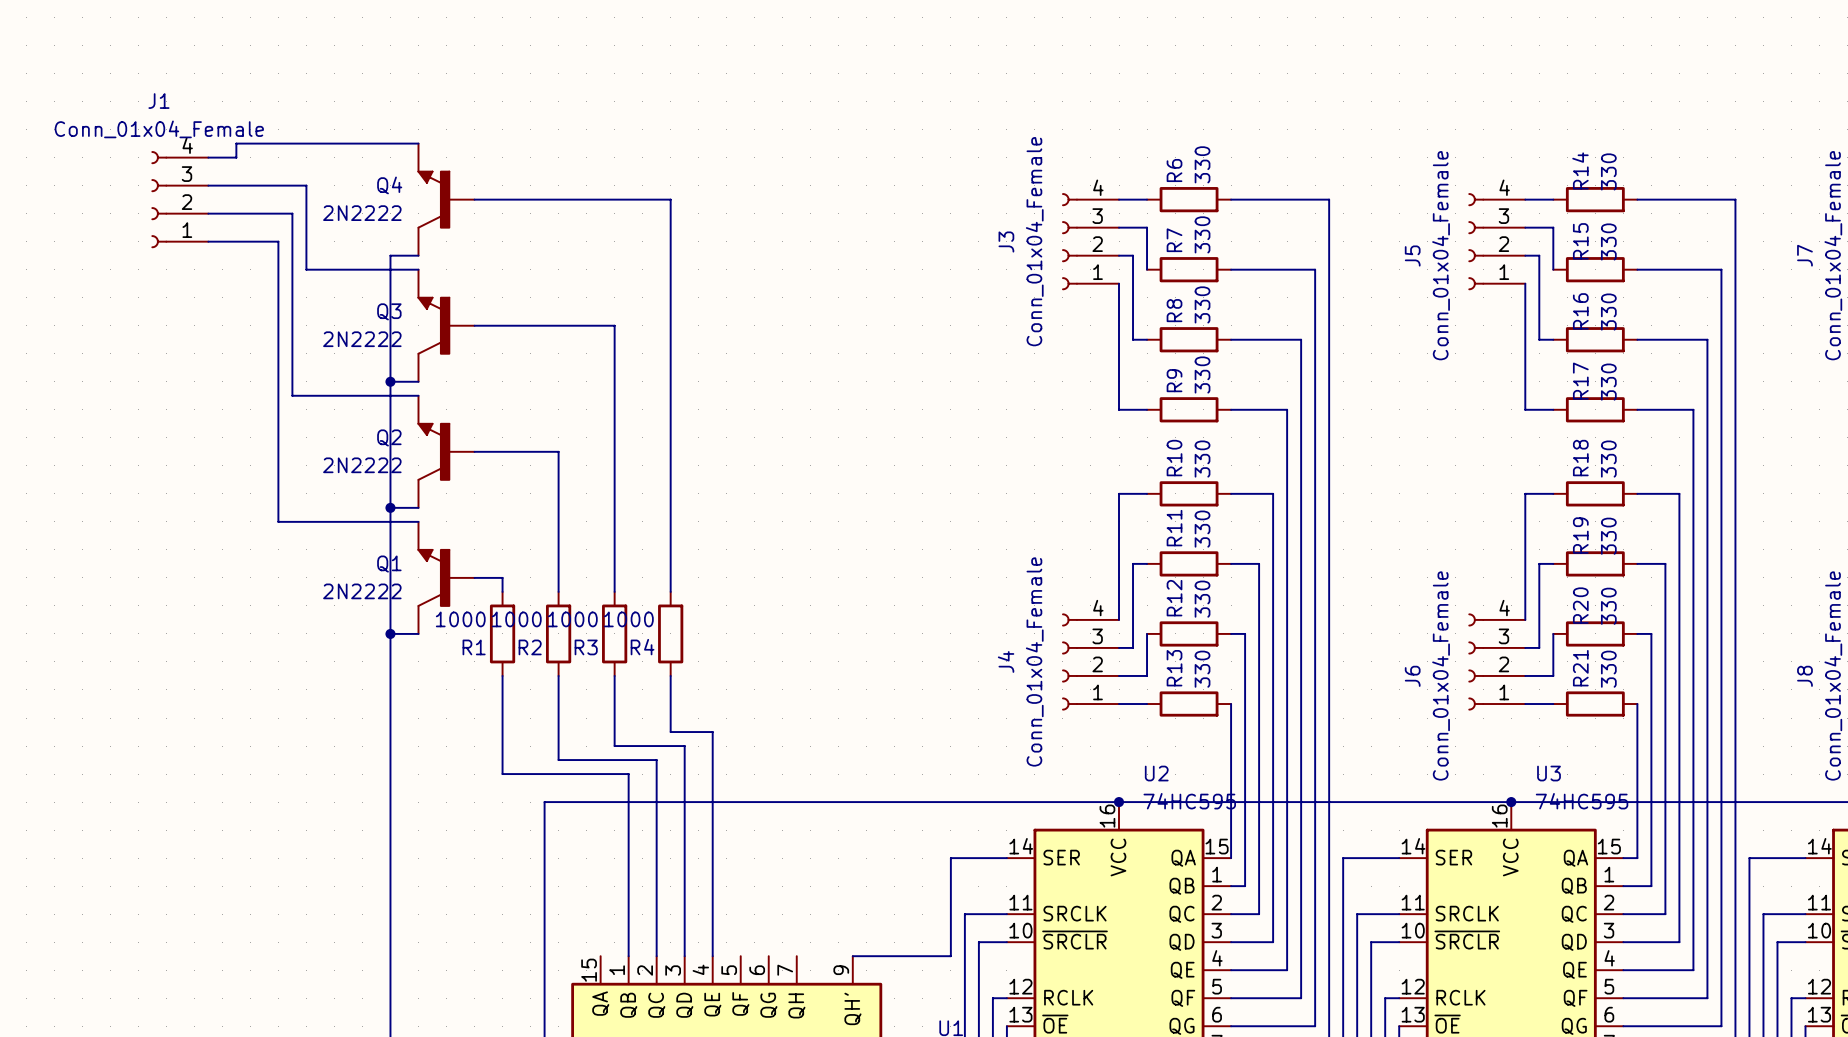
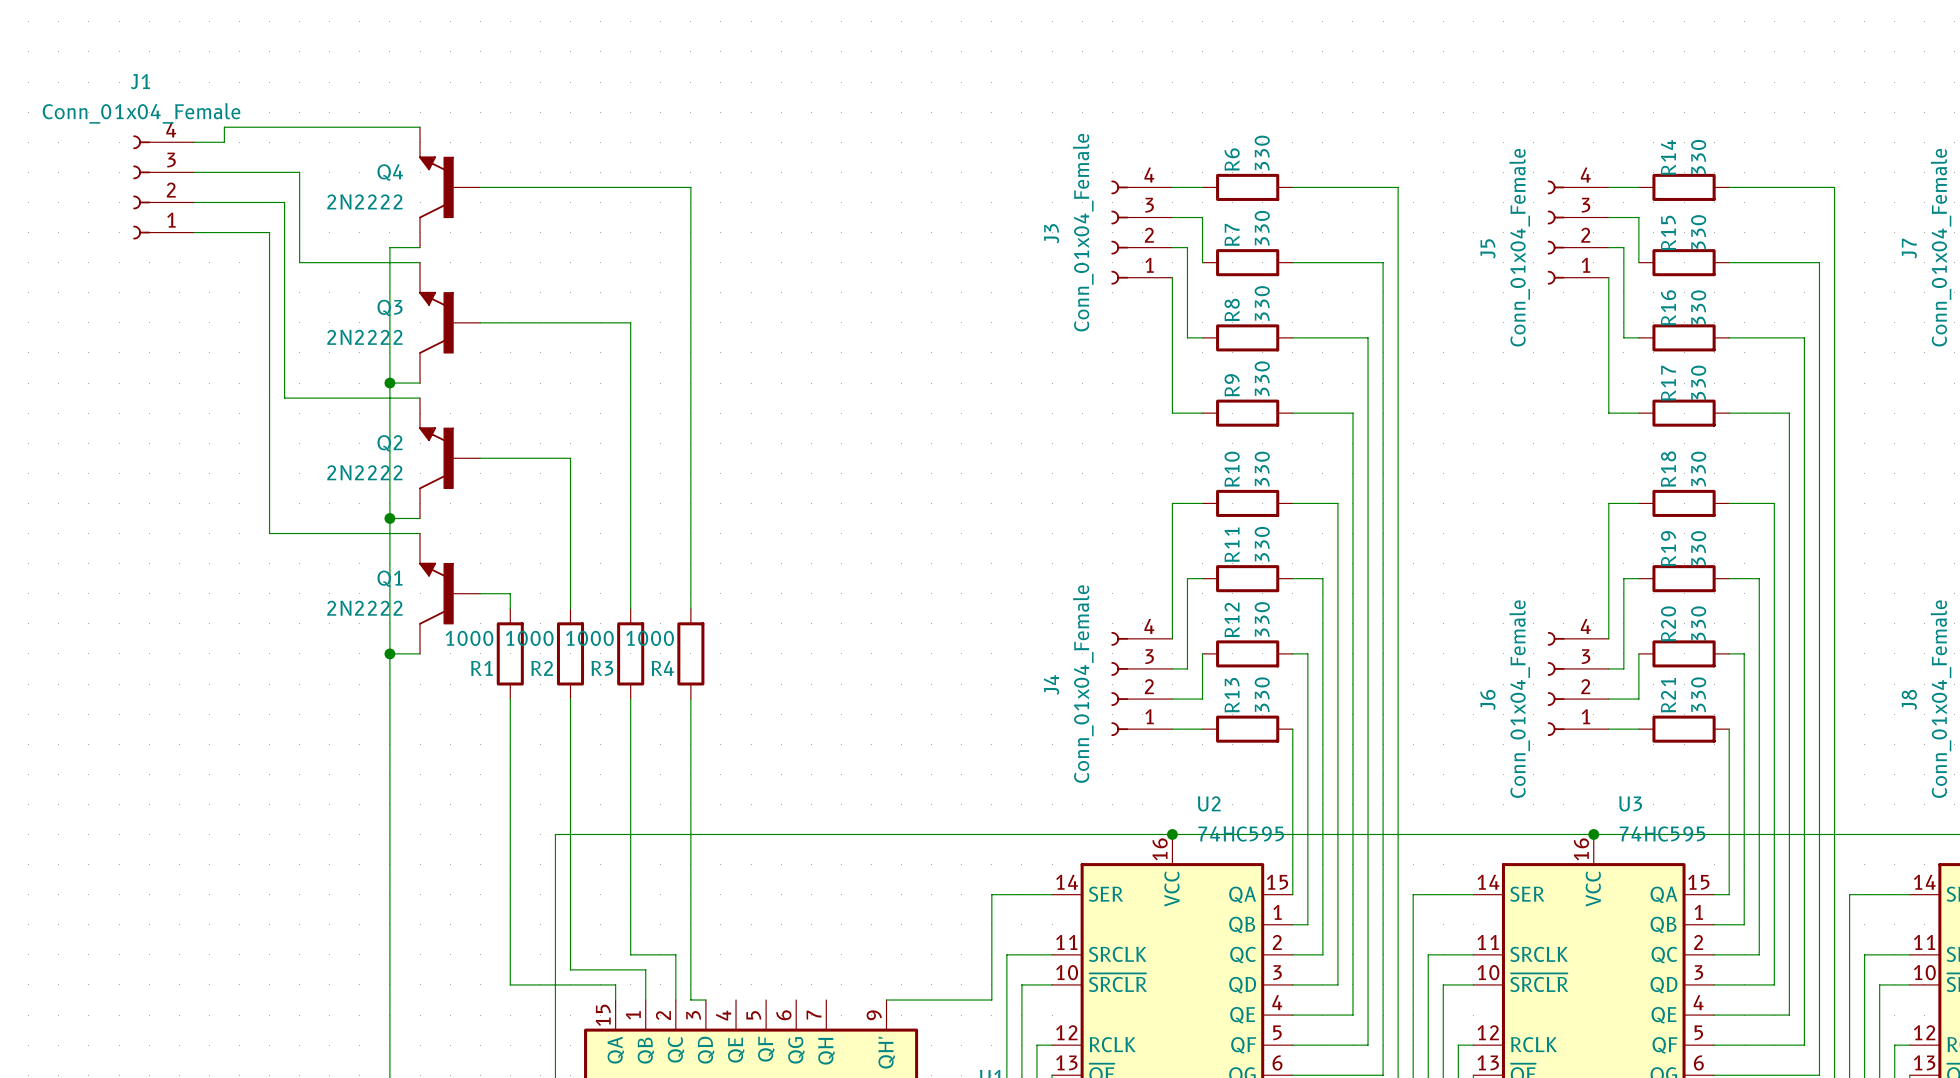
wire: (670, 732) (712, 732) (712, 956) -> (690, 759) (690, 1000) (705, 1000)
wire: (614, 746) (684, 746) (684, 956) -> (630, 774) (630, 954) (675, 954)
wire: (558, 760) (656, 760) (656, 914) -> (570, 789) (570, 969) (645, 969)
wire: (502, 774) (628, 774) (628, 928) -> (510, 804) (510, 984) (615, 984) (615, 1000)

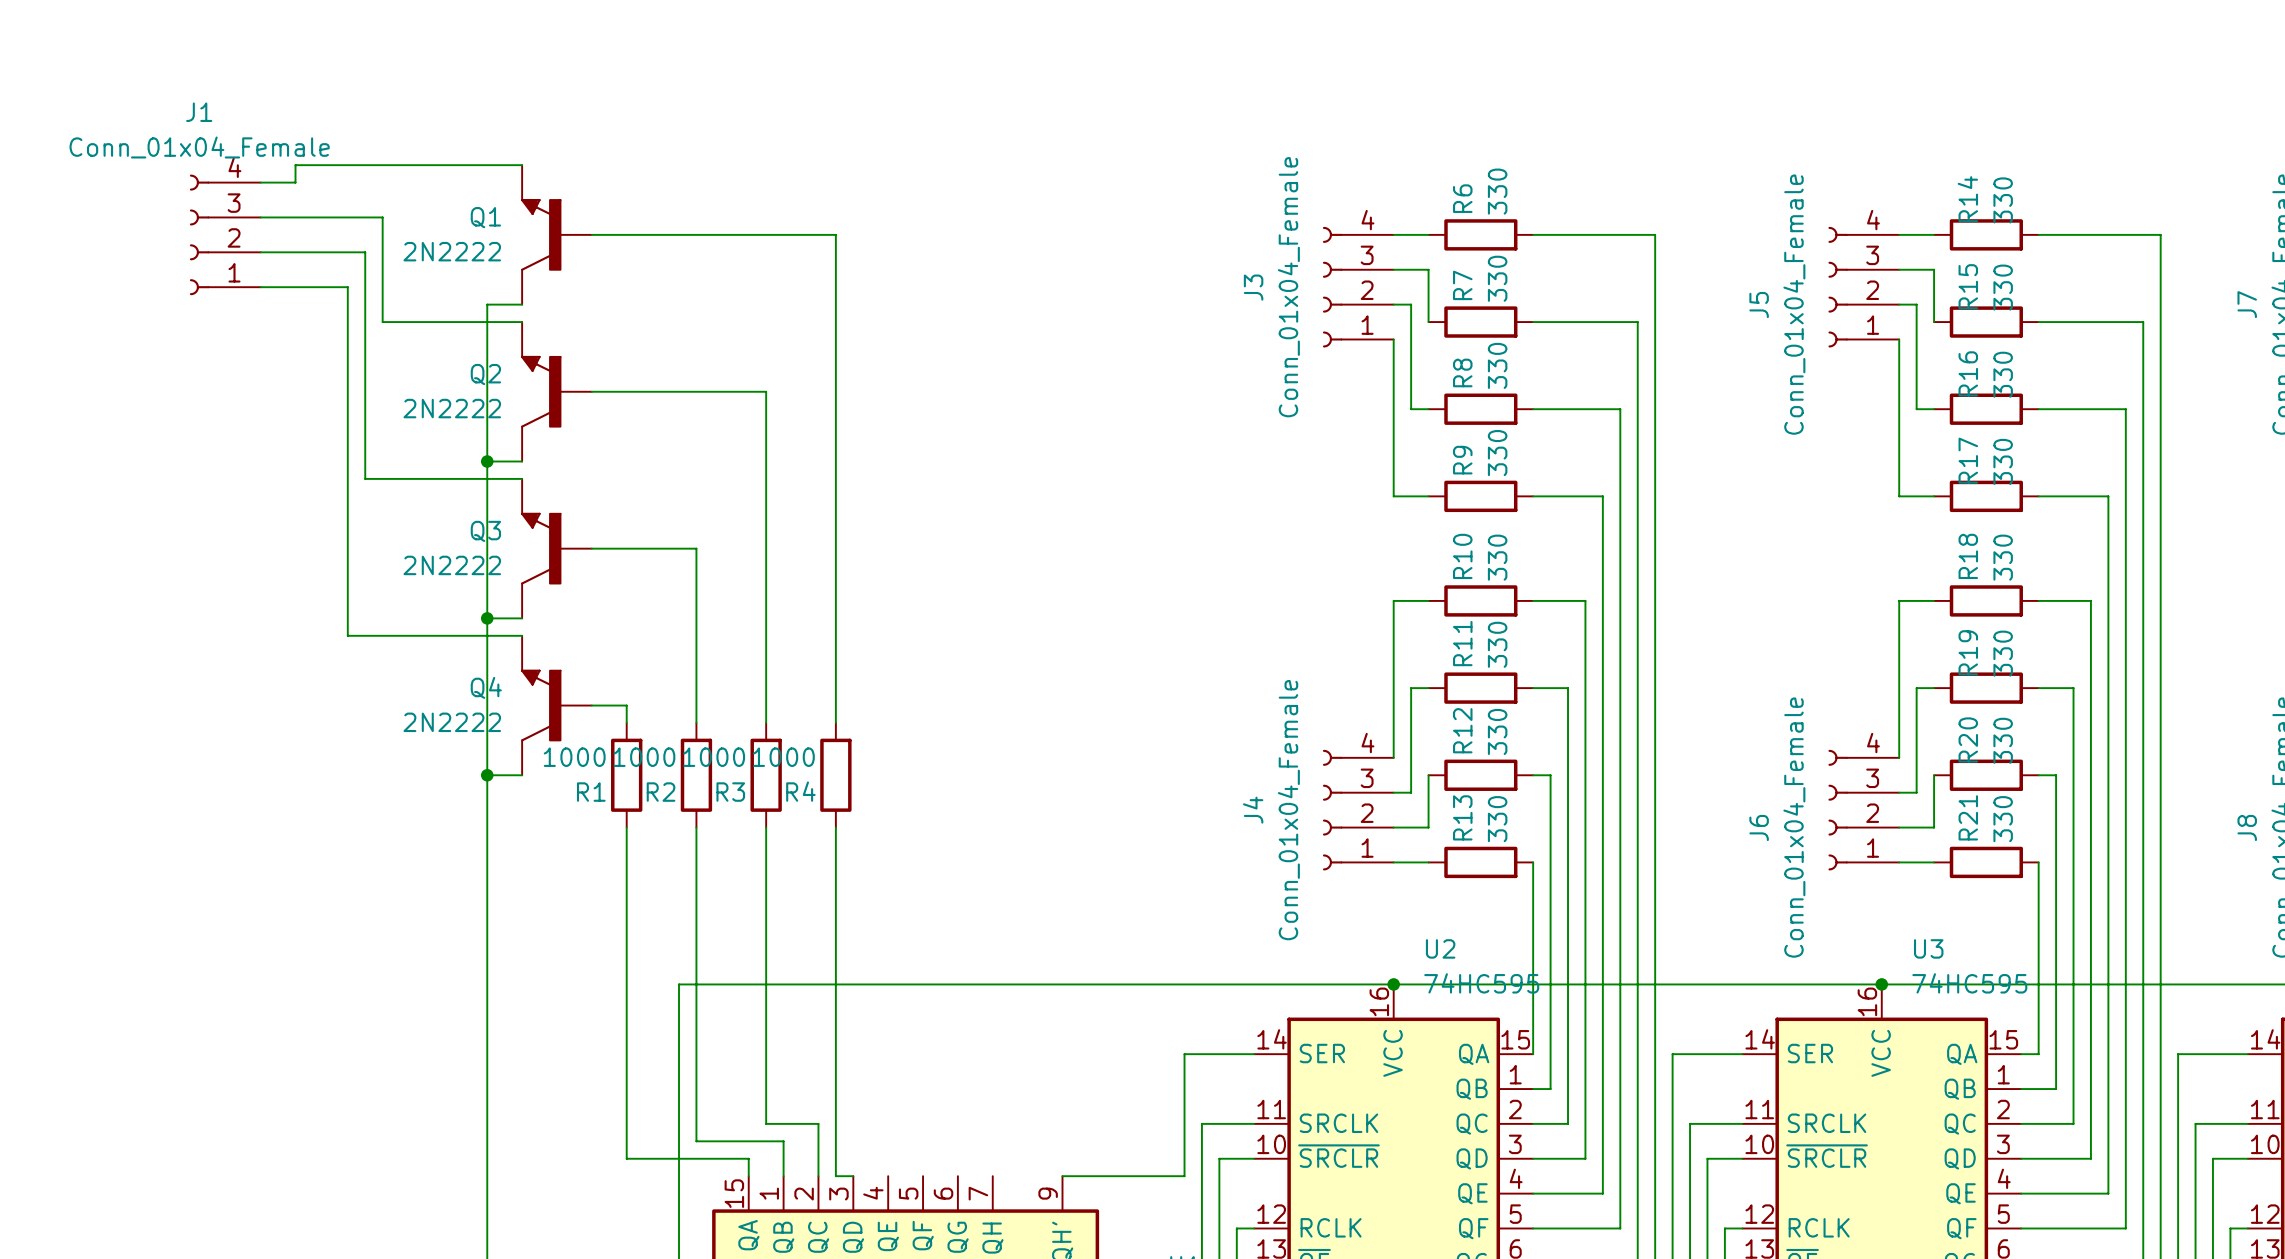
Q4 name: Q4 (390, 172) -> Q1 (485, 217)
Q3 name: Q3 (390, 307) -> Q2 (485, 374)
Q2 name: Q2 (390, 443) -> Q3 (485, 531)
Q1 name: Q1 (389, 578) -> Q4 (486, 687)

